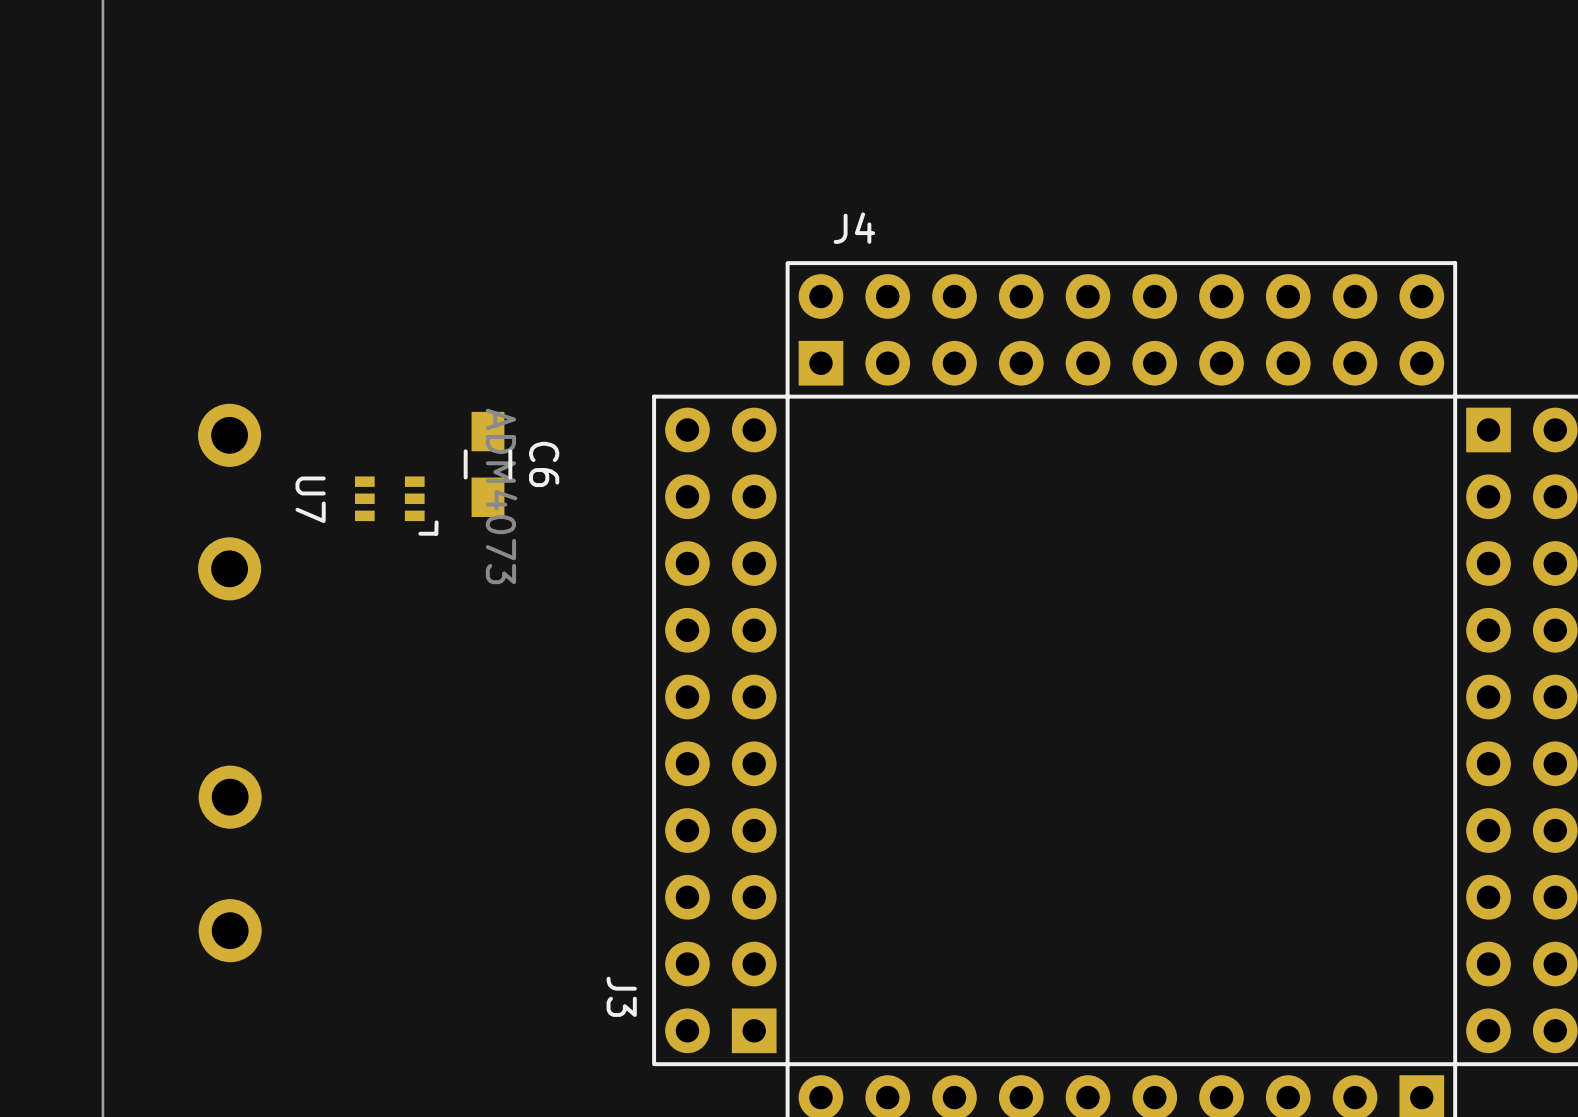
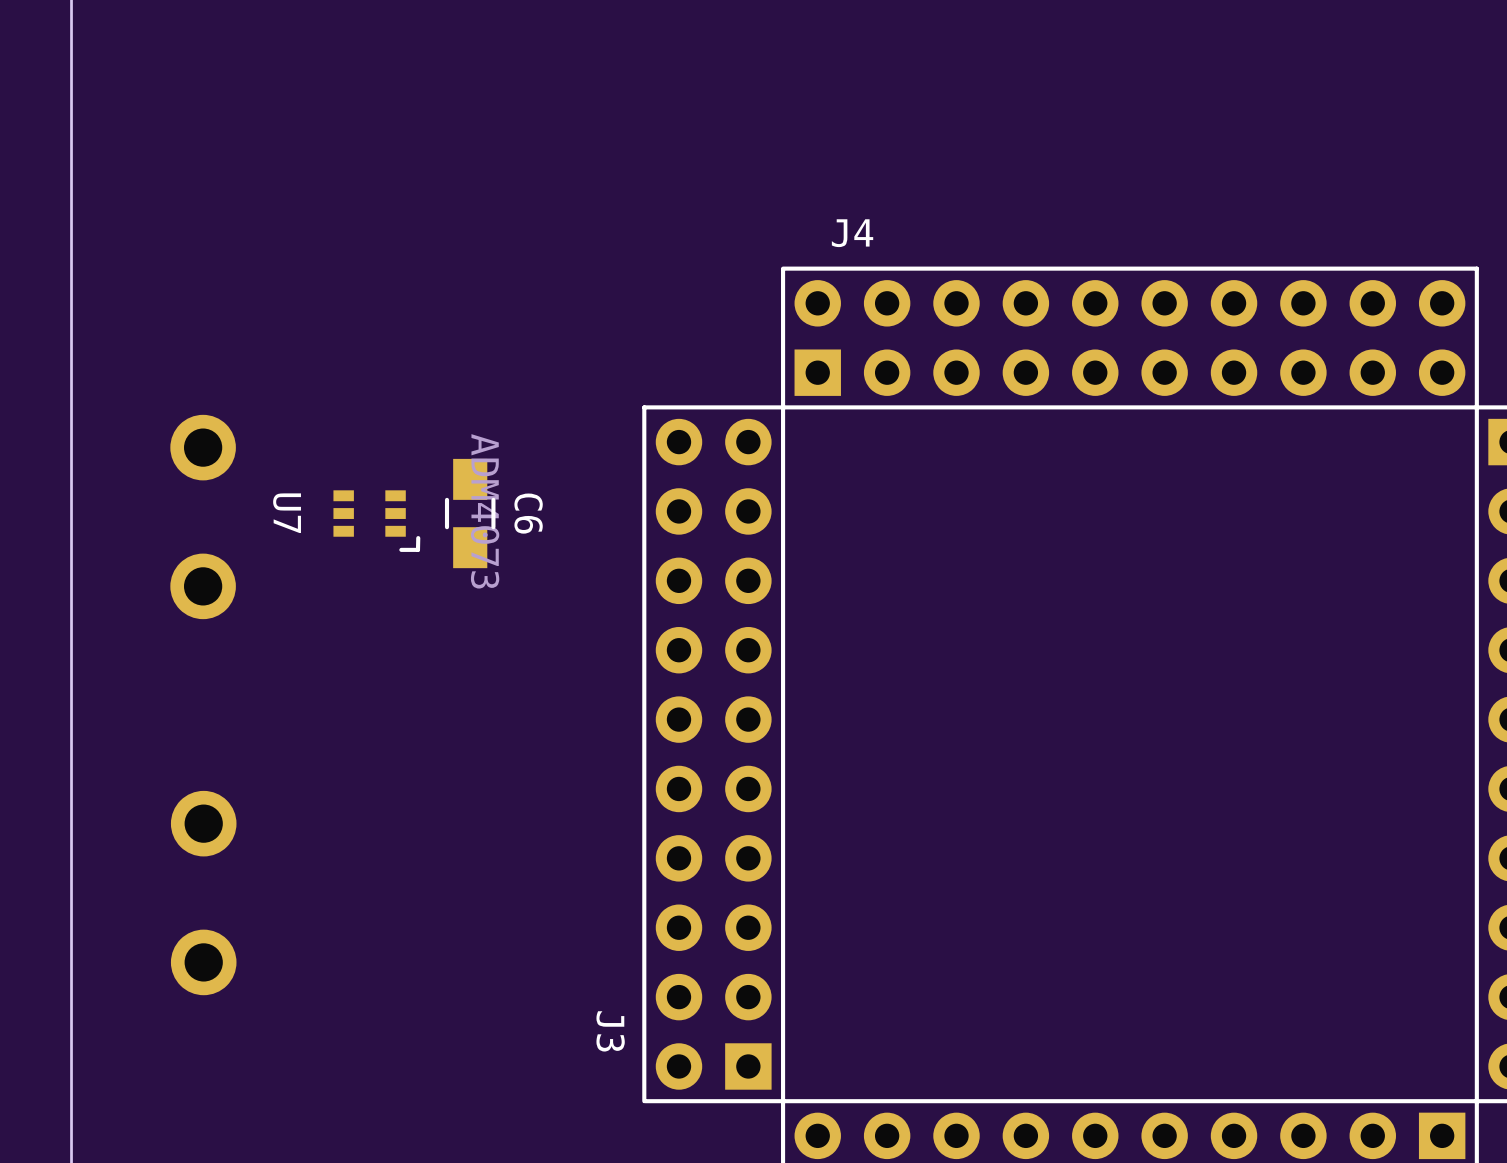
C6 position: (487, 464) -> (470, 513)

